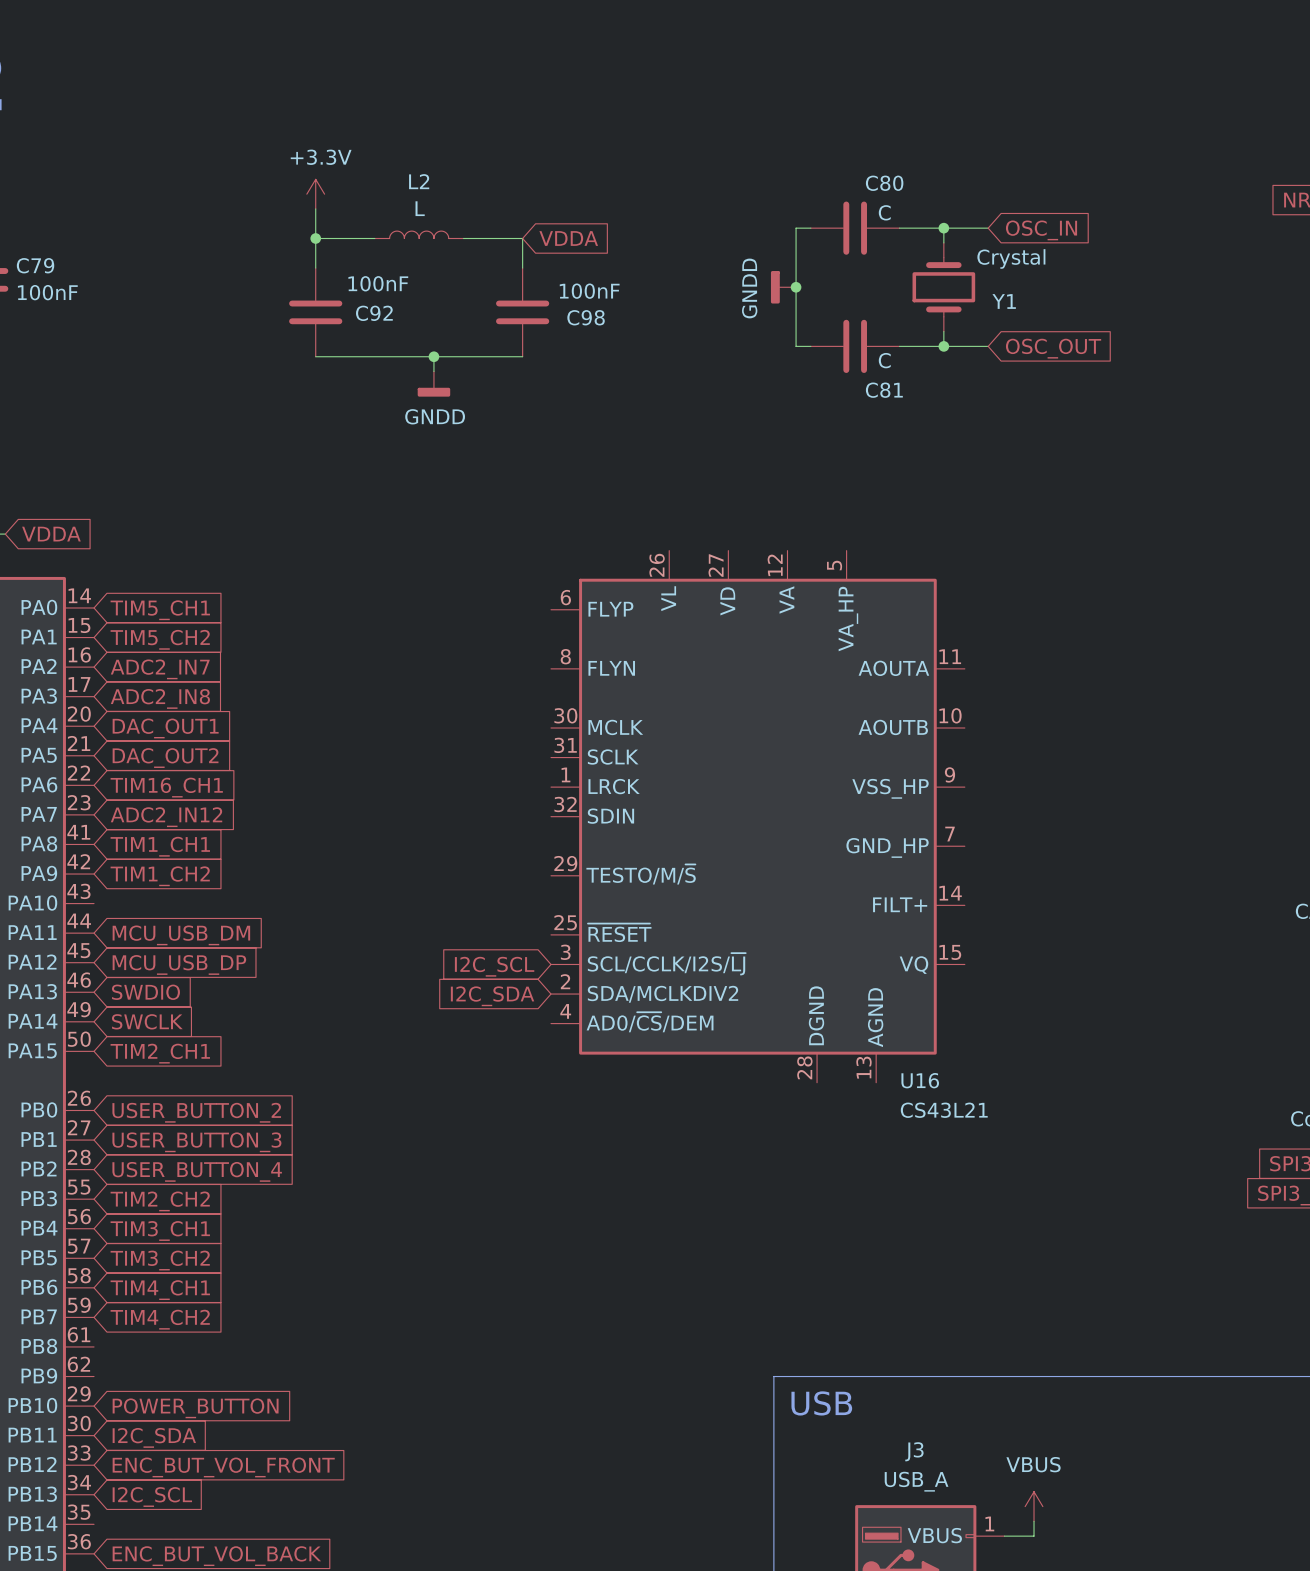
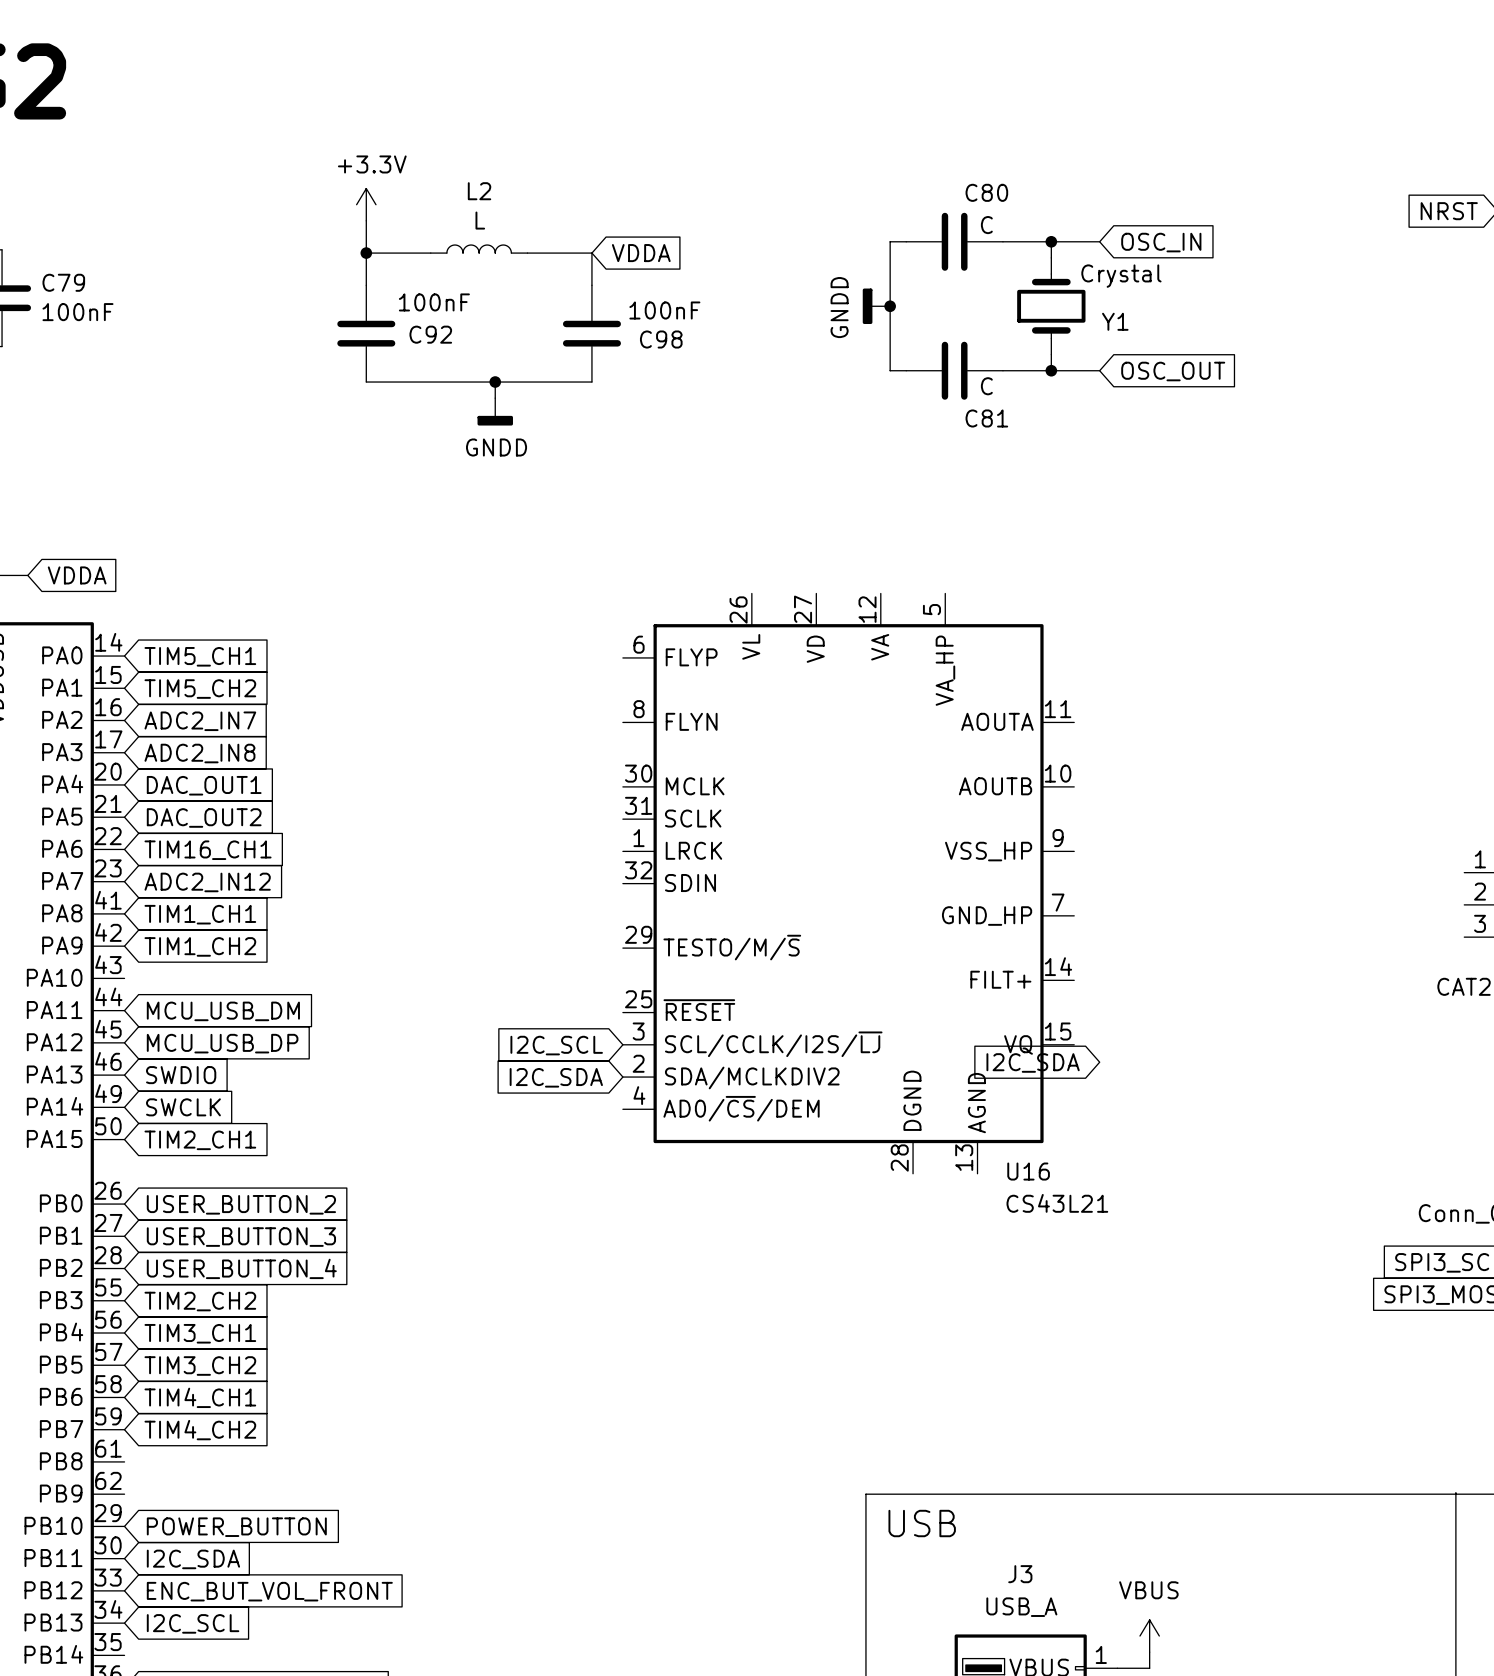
global label: none -> I2C_SDA (1033, 1062)

